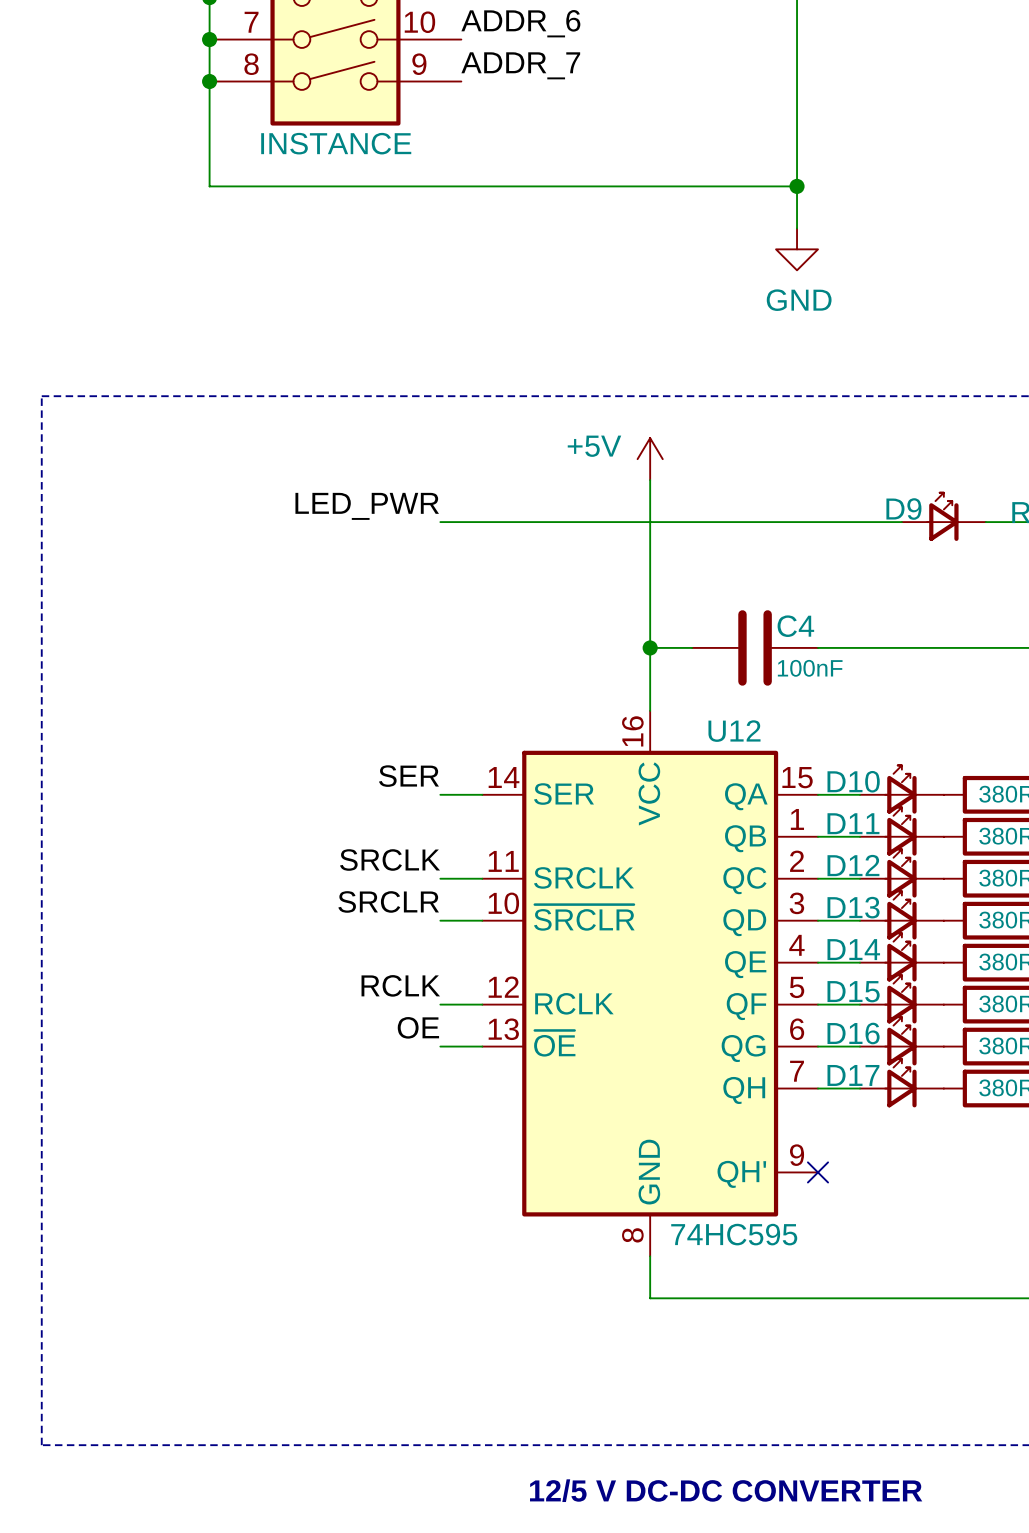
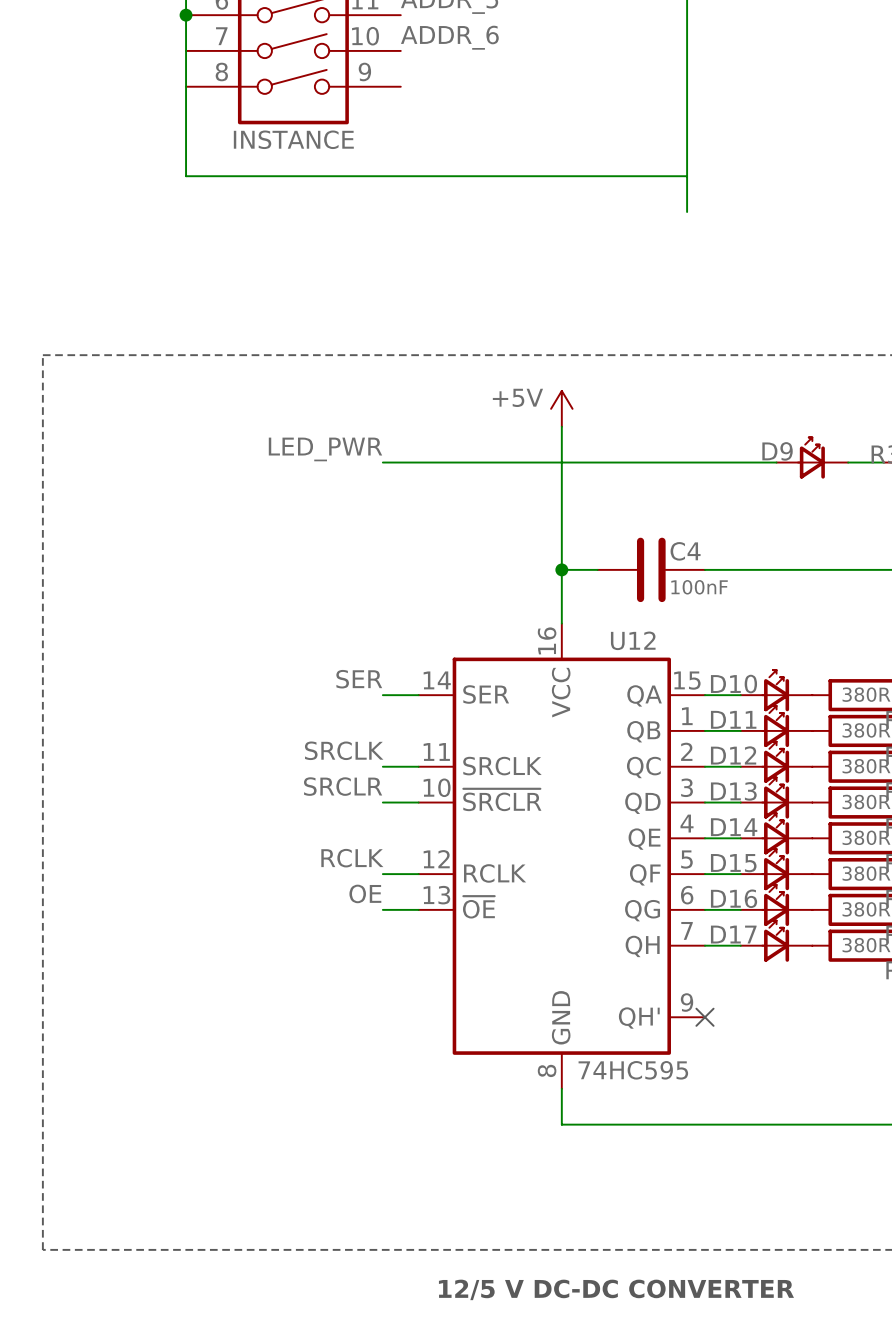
junction: (209, 39) -> none
label: ADDR_7 (520, 65) -> none
junction: (209, 81) -> none
junction: (797, 186) -> none
power symbol: GND (797, 249) -> none

